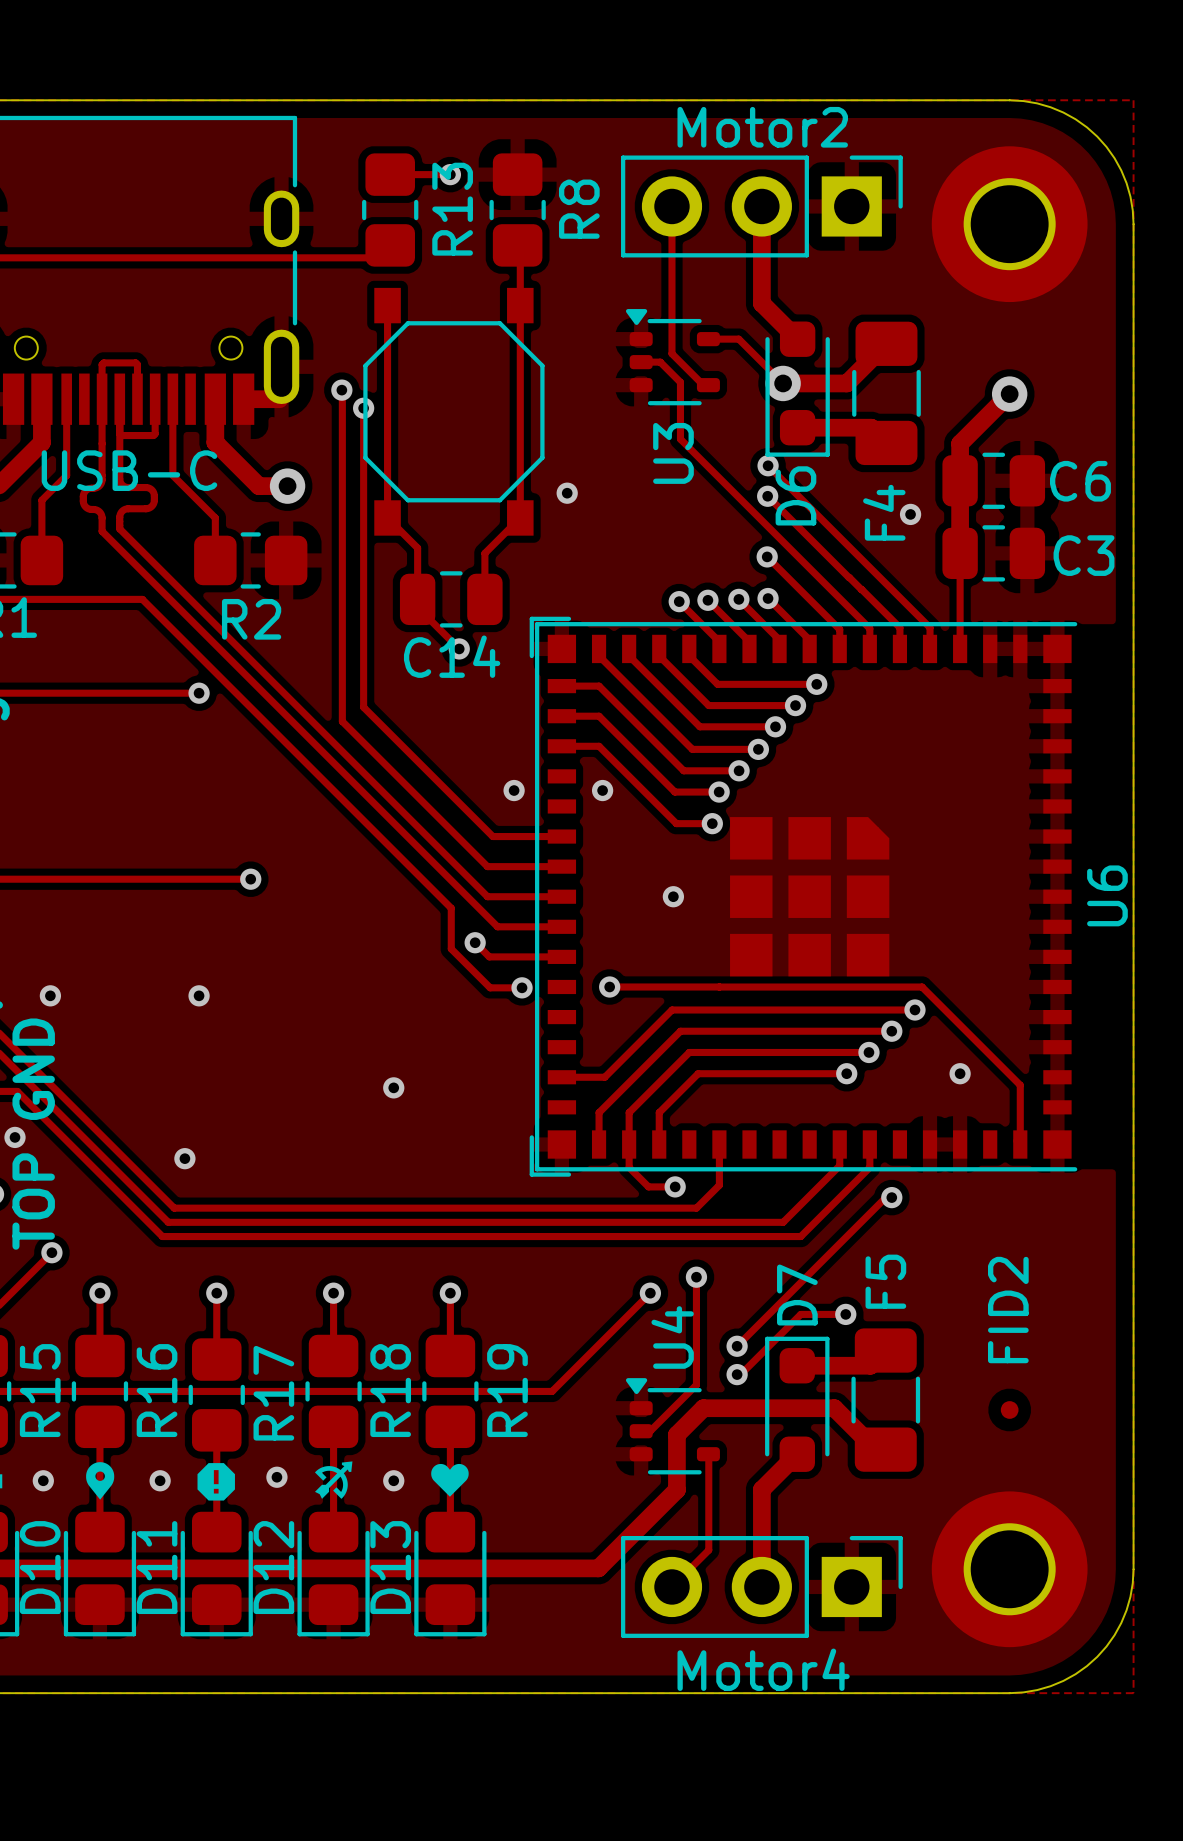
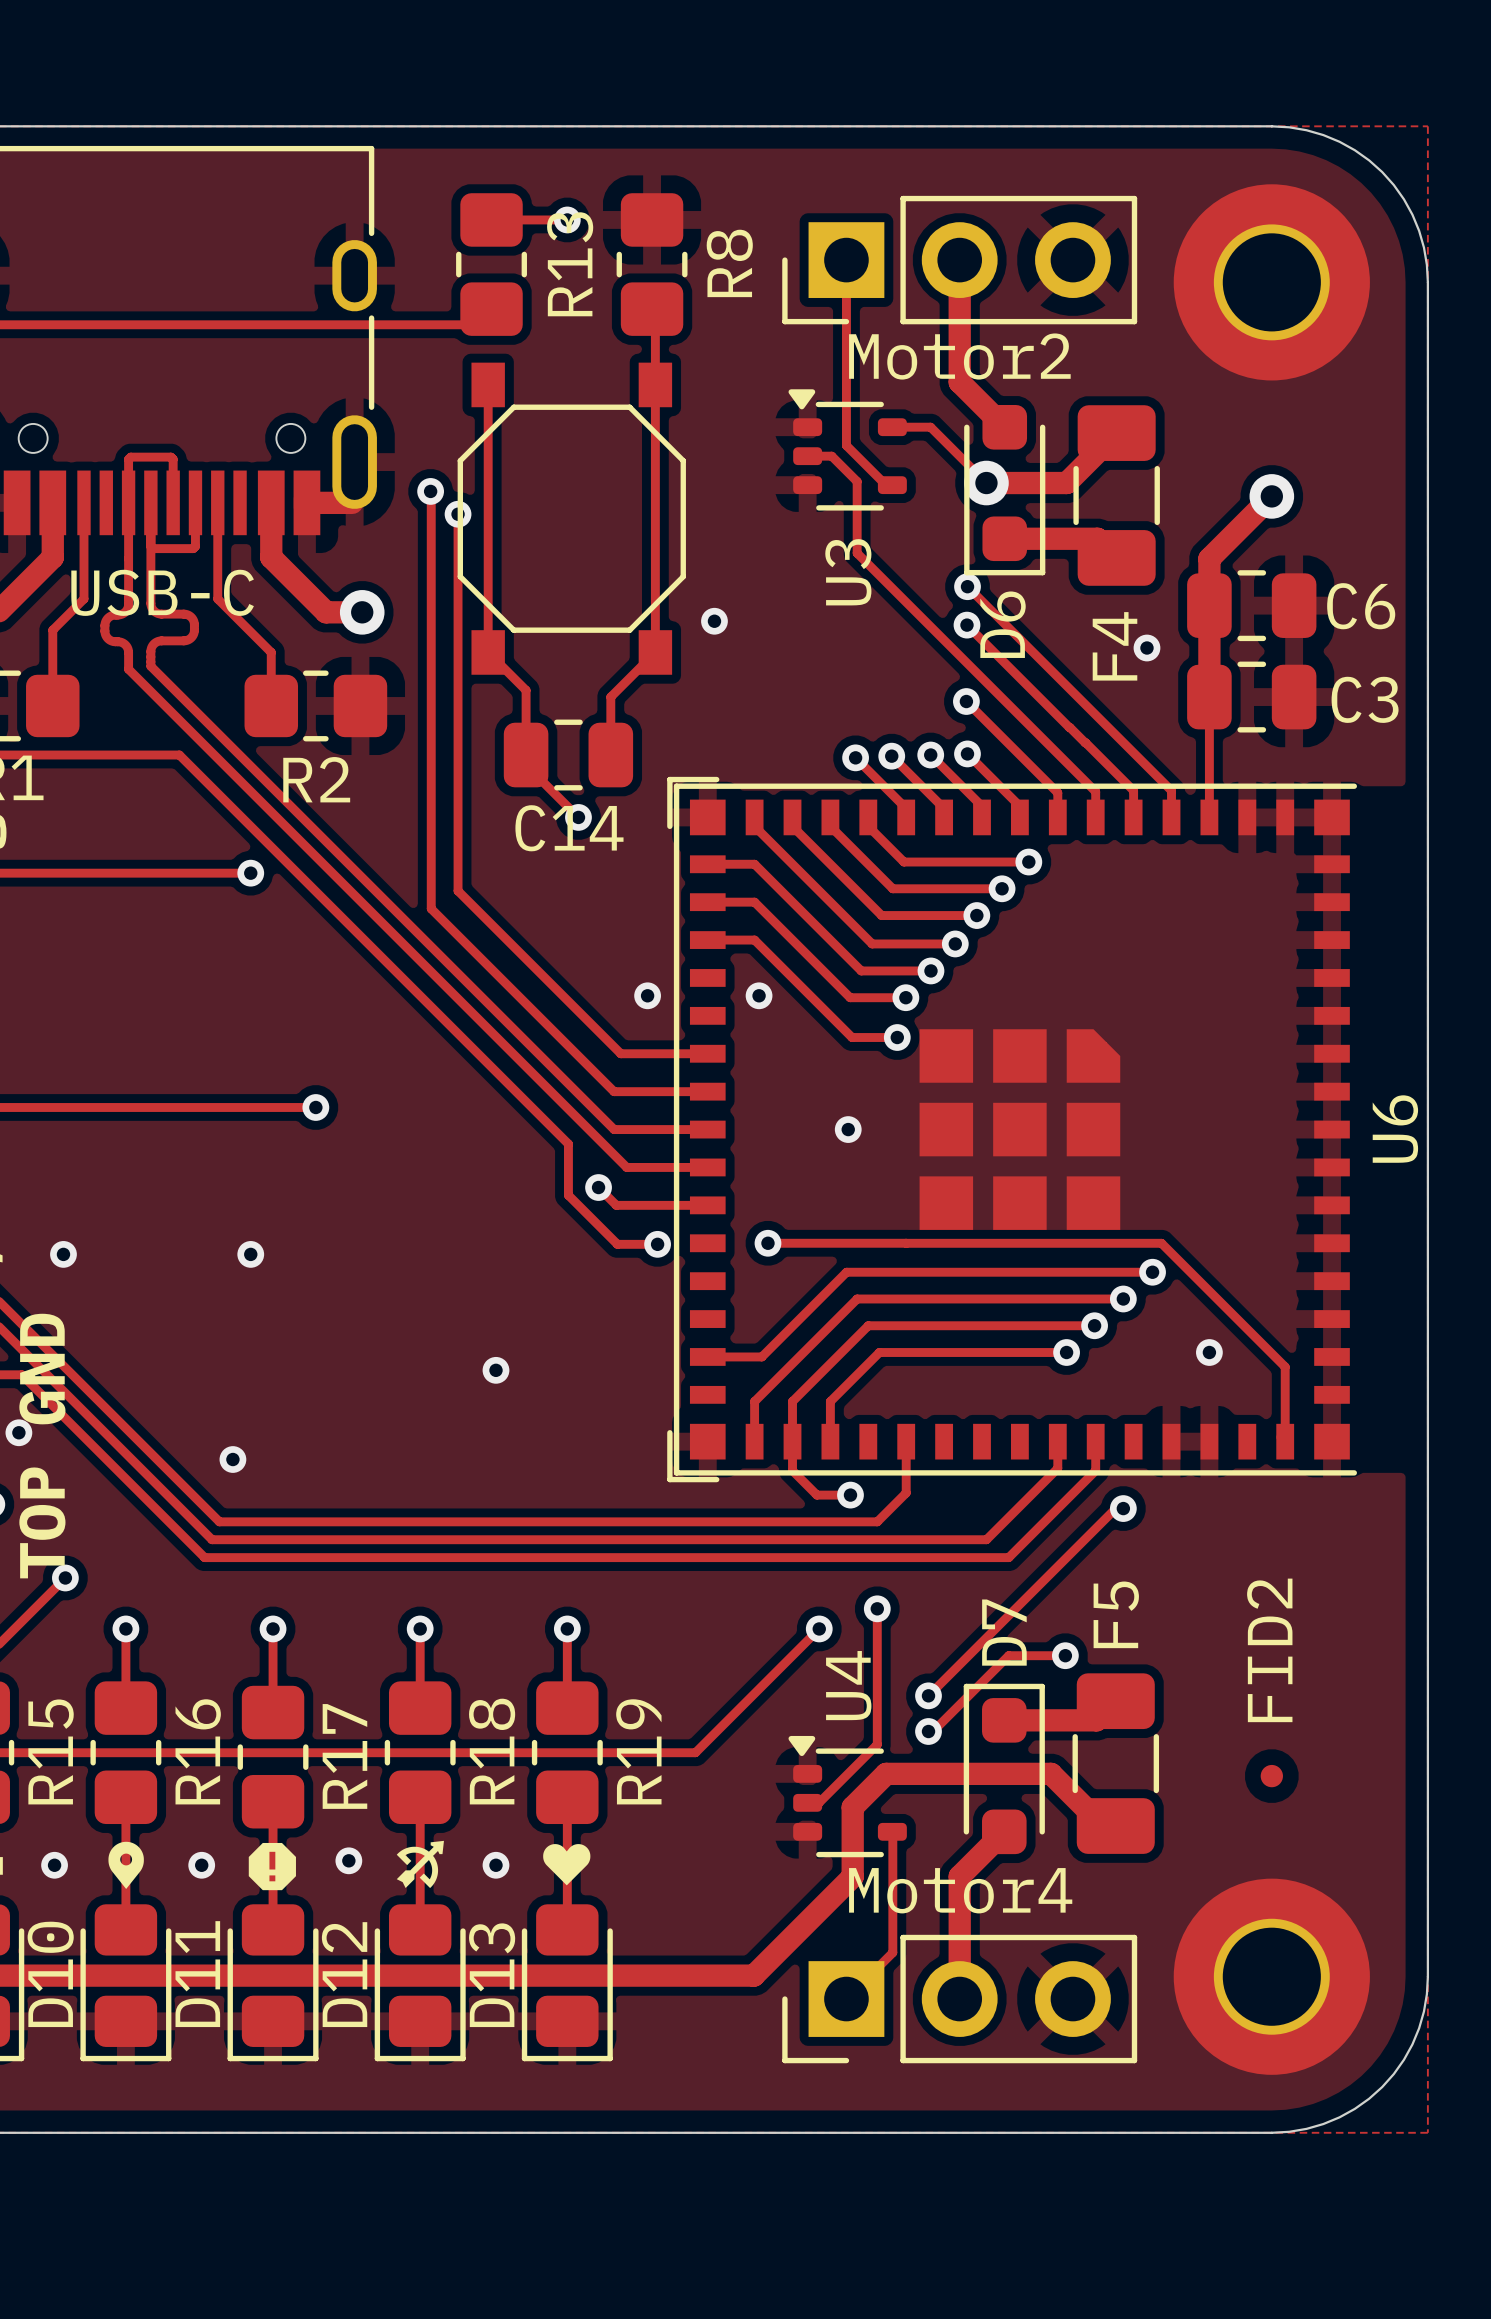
Motor2 rotation: 0° (761, 206) -> 180° (959, 260)
Motor4 rotation: 0° (761, 1586) -> 180° (959, 1999)

